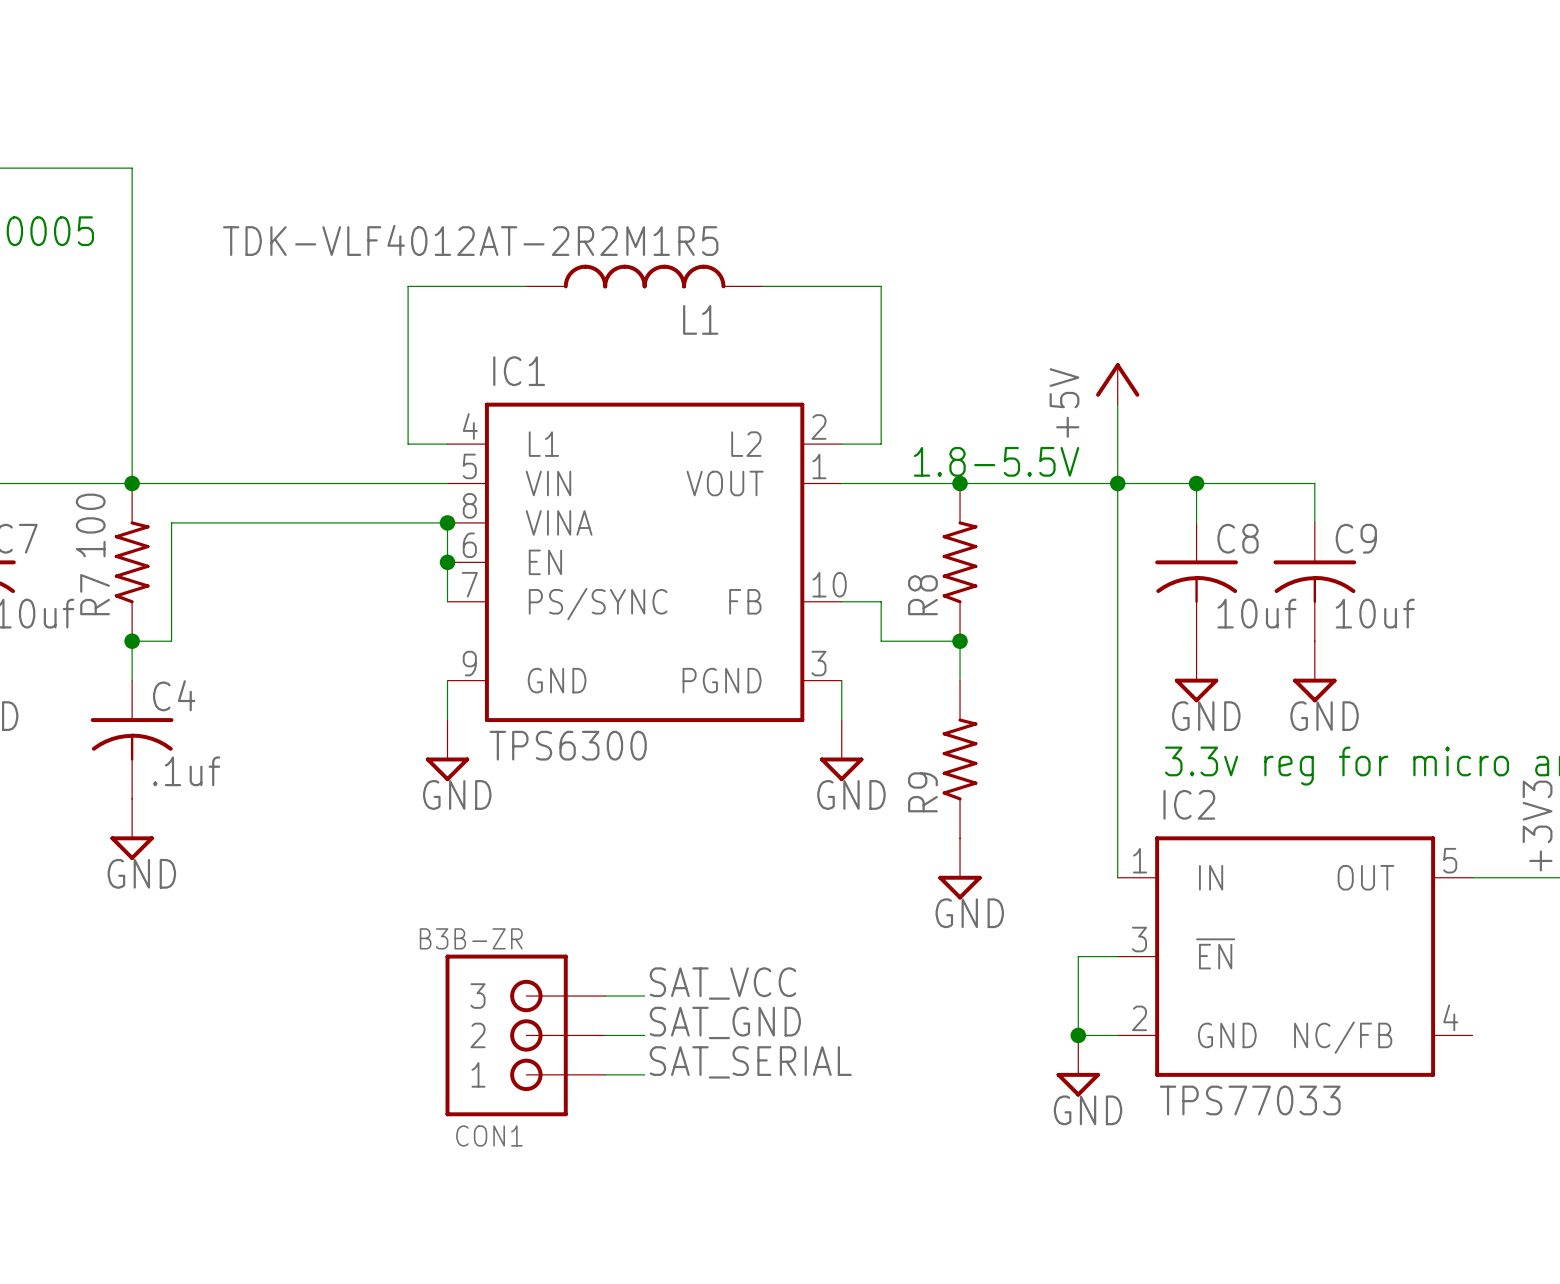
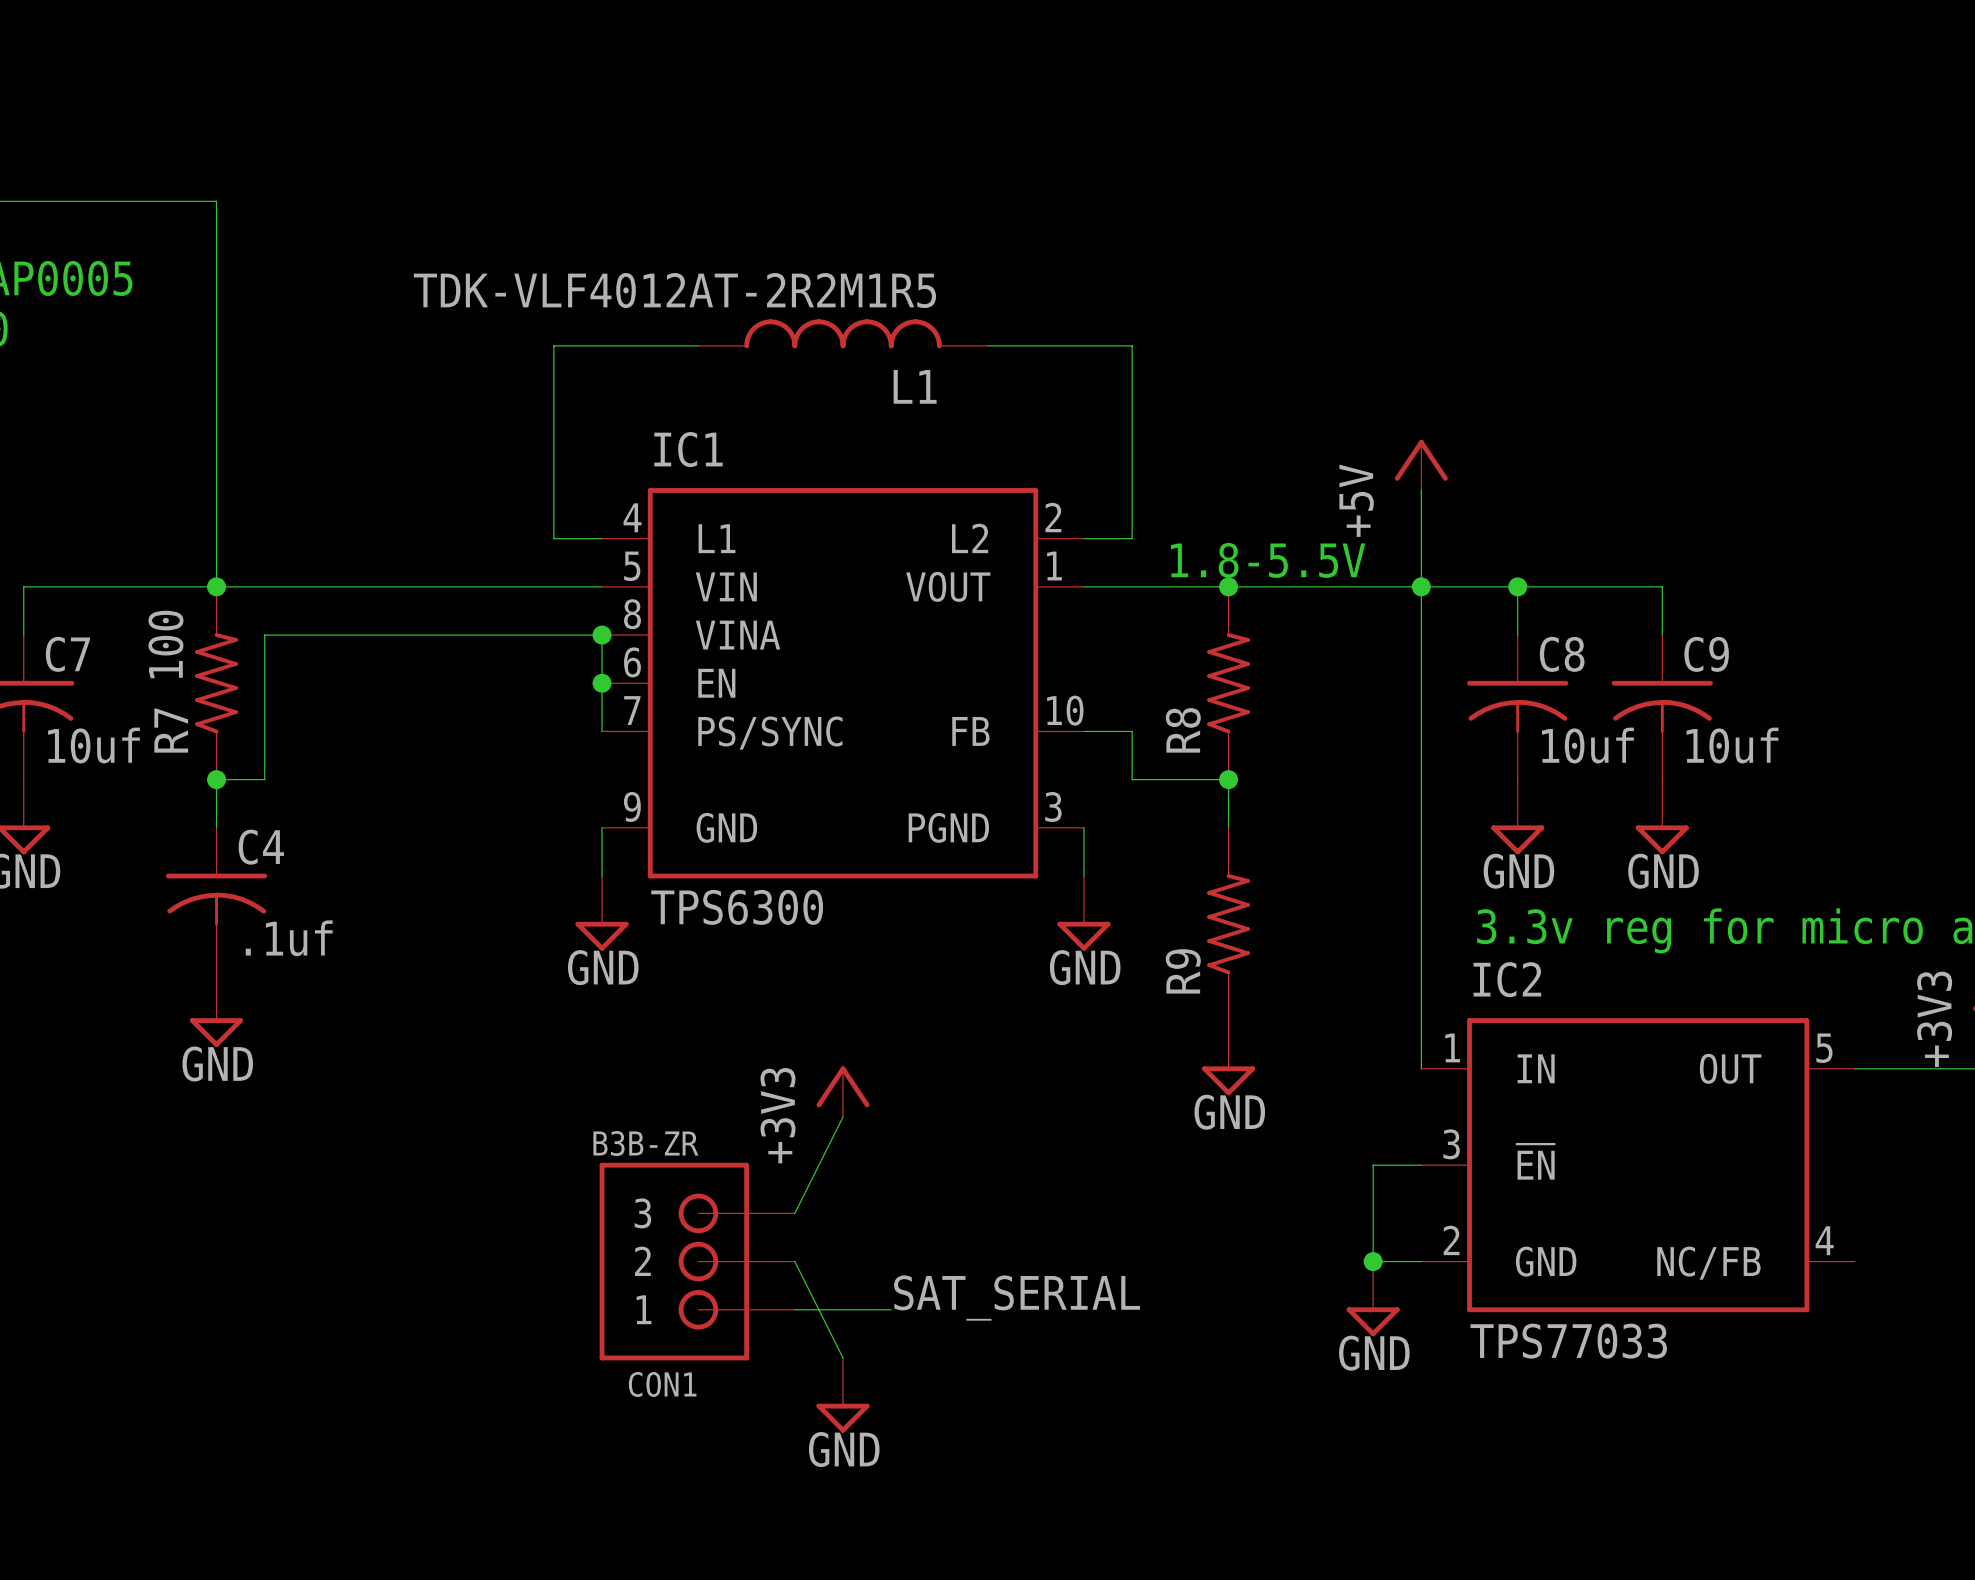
power symbol: none -> +3V3 (843, 1091)
label: SAT_VCC (722, 983) -> none
wire: (605, 996) (644, 996) -> (794, 1213) (843, 1116)
label: SAT_GND (725, 1022) -> none
wire: (605, 1035) (644, 1035) -> (794, 1261) (843, 1357)
label position: SAT_SERIAL (750, 1062) -> SAT_SERIAL (1017, 1298)
wire: none -> (843, 1309) (891, 1309)
power symbol: none -> GND (843, 1395)

